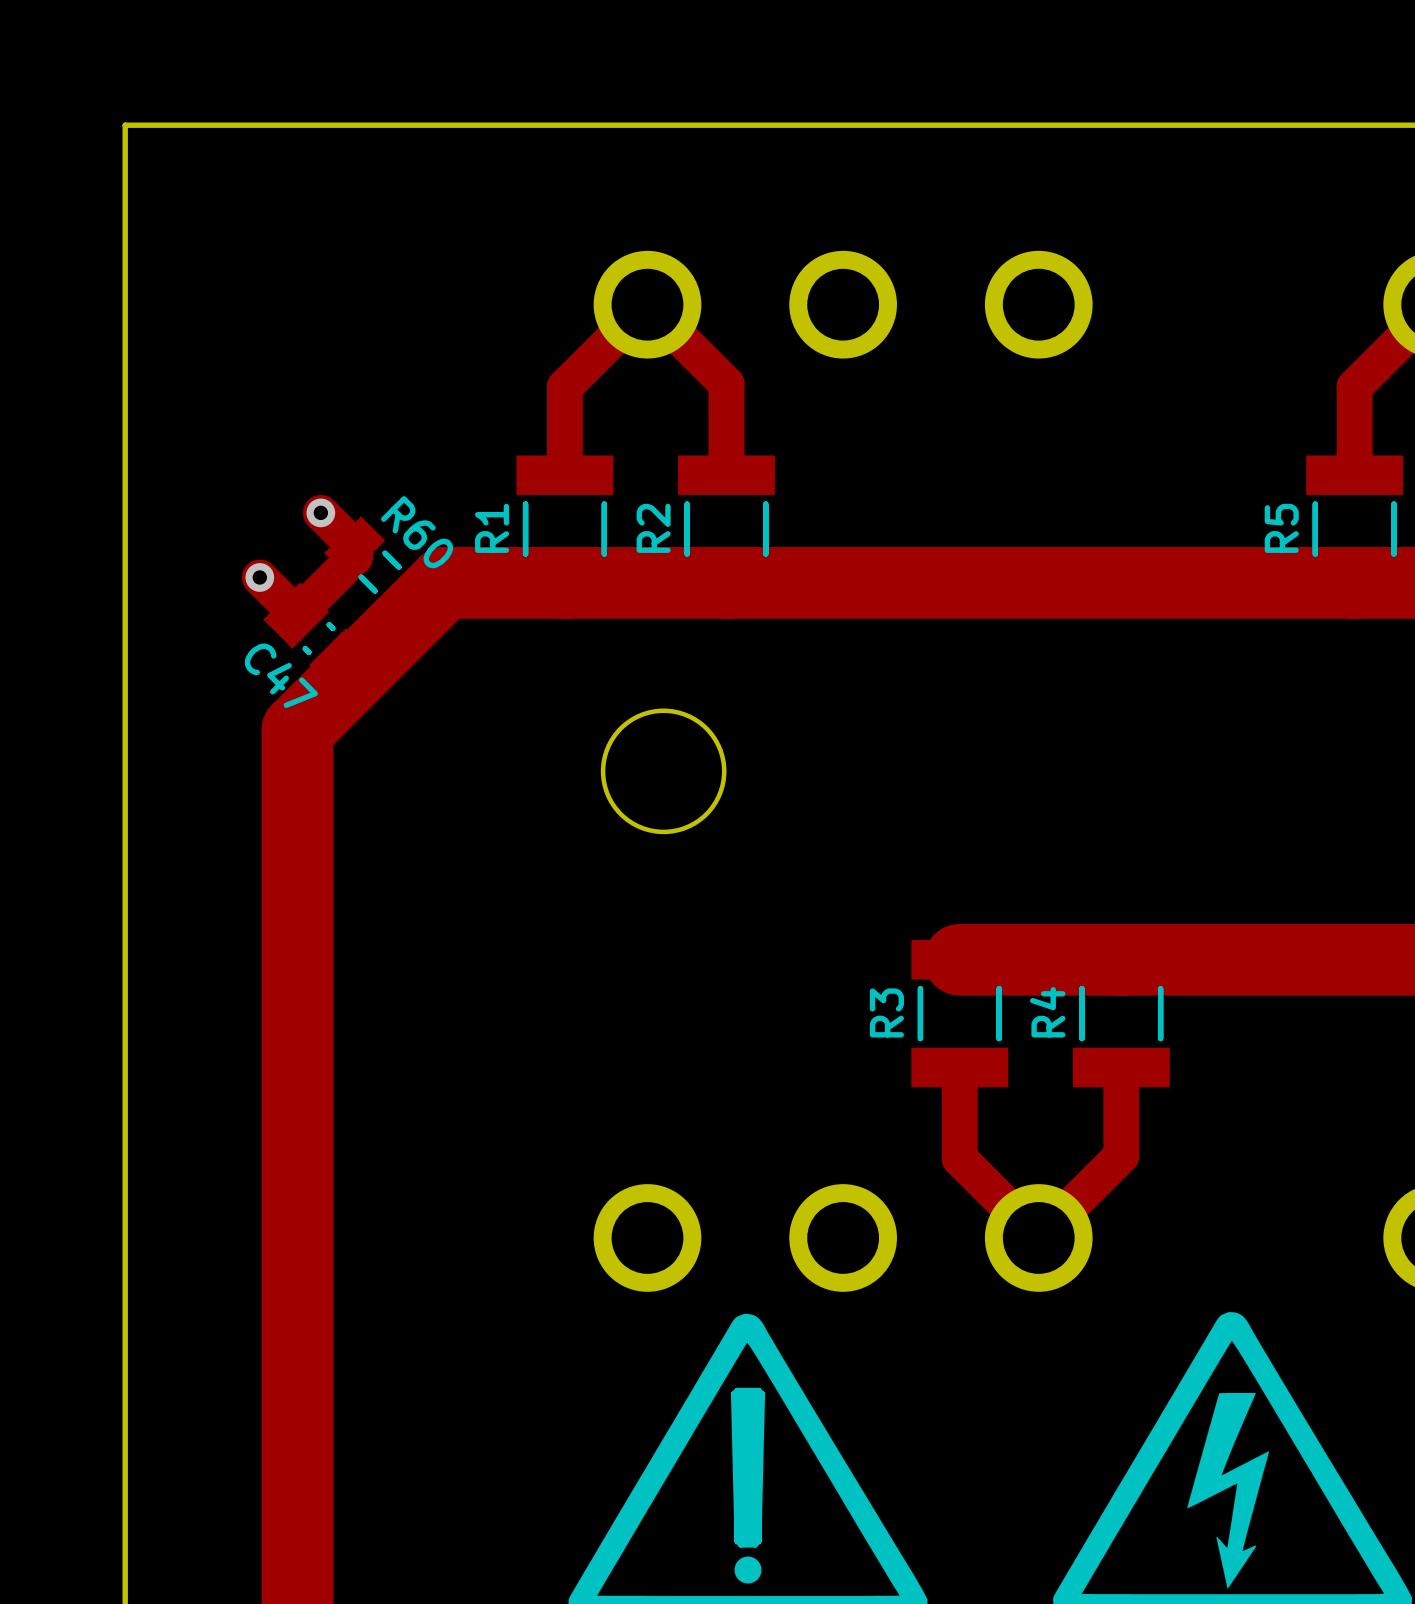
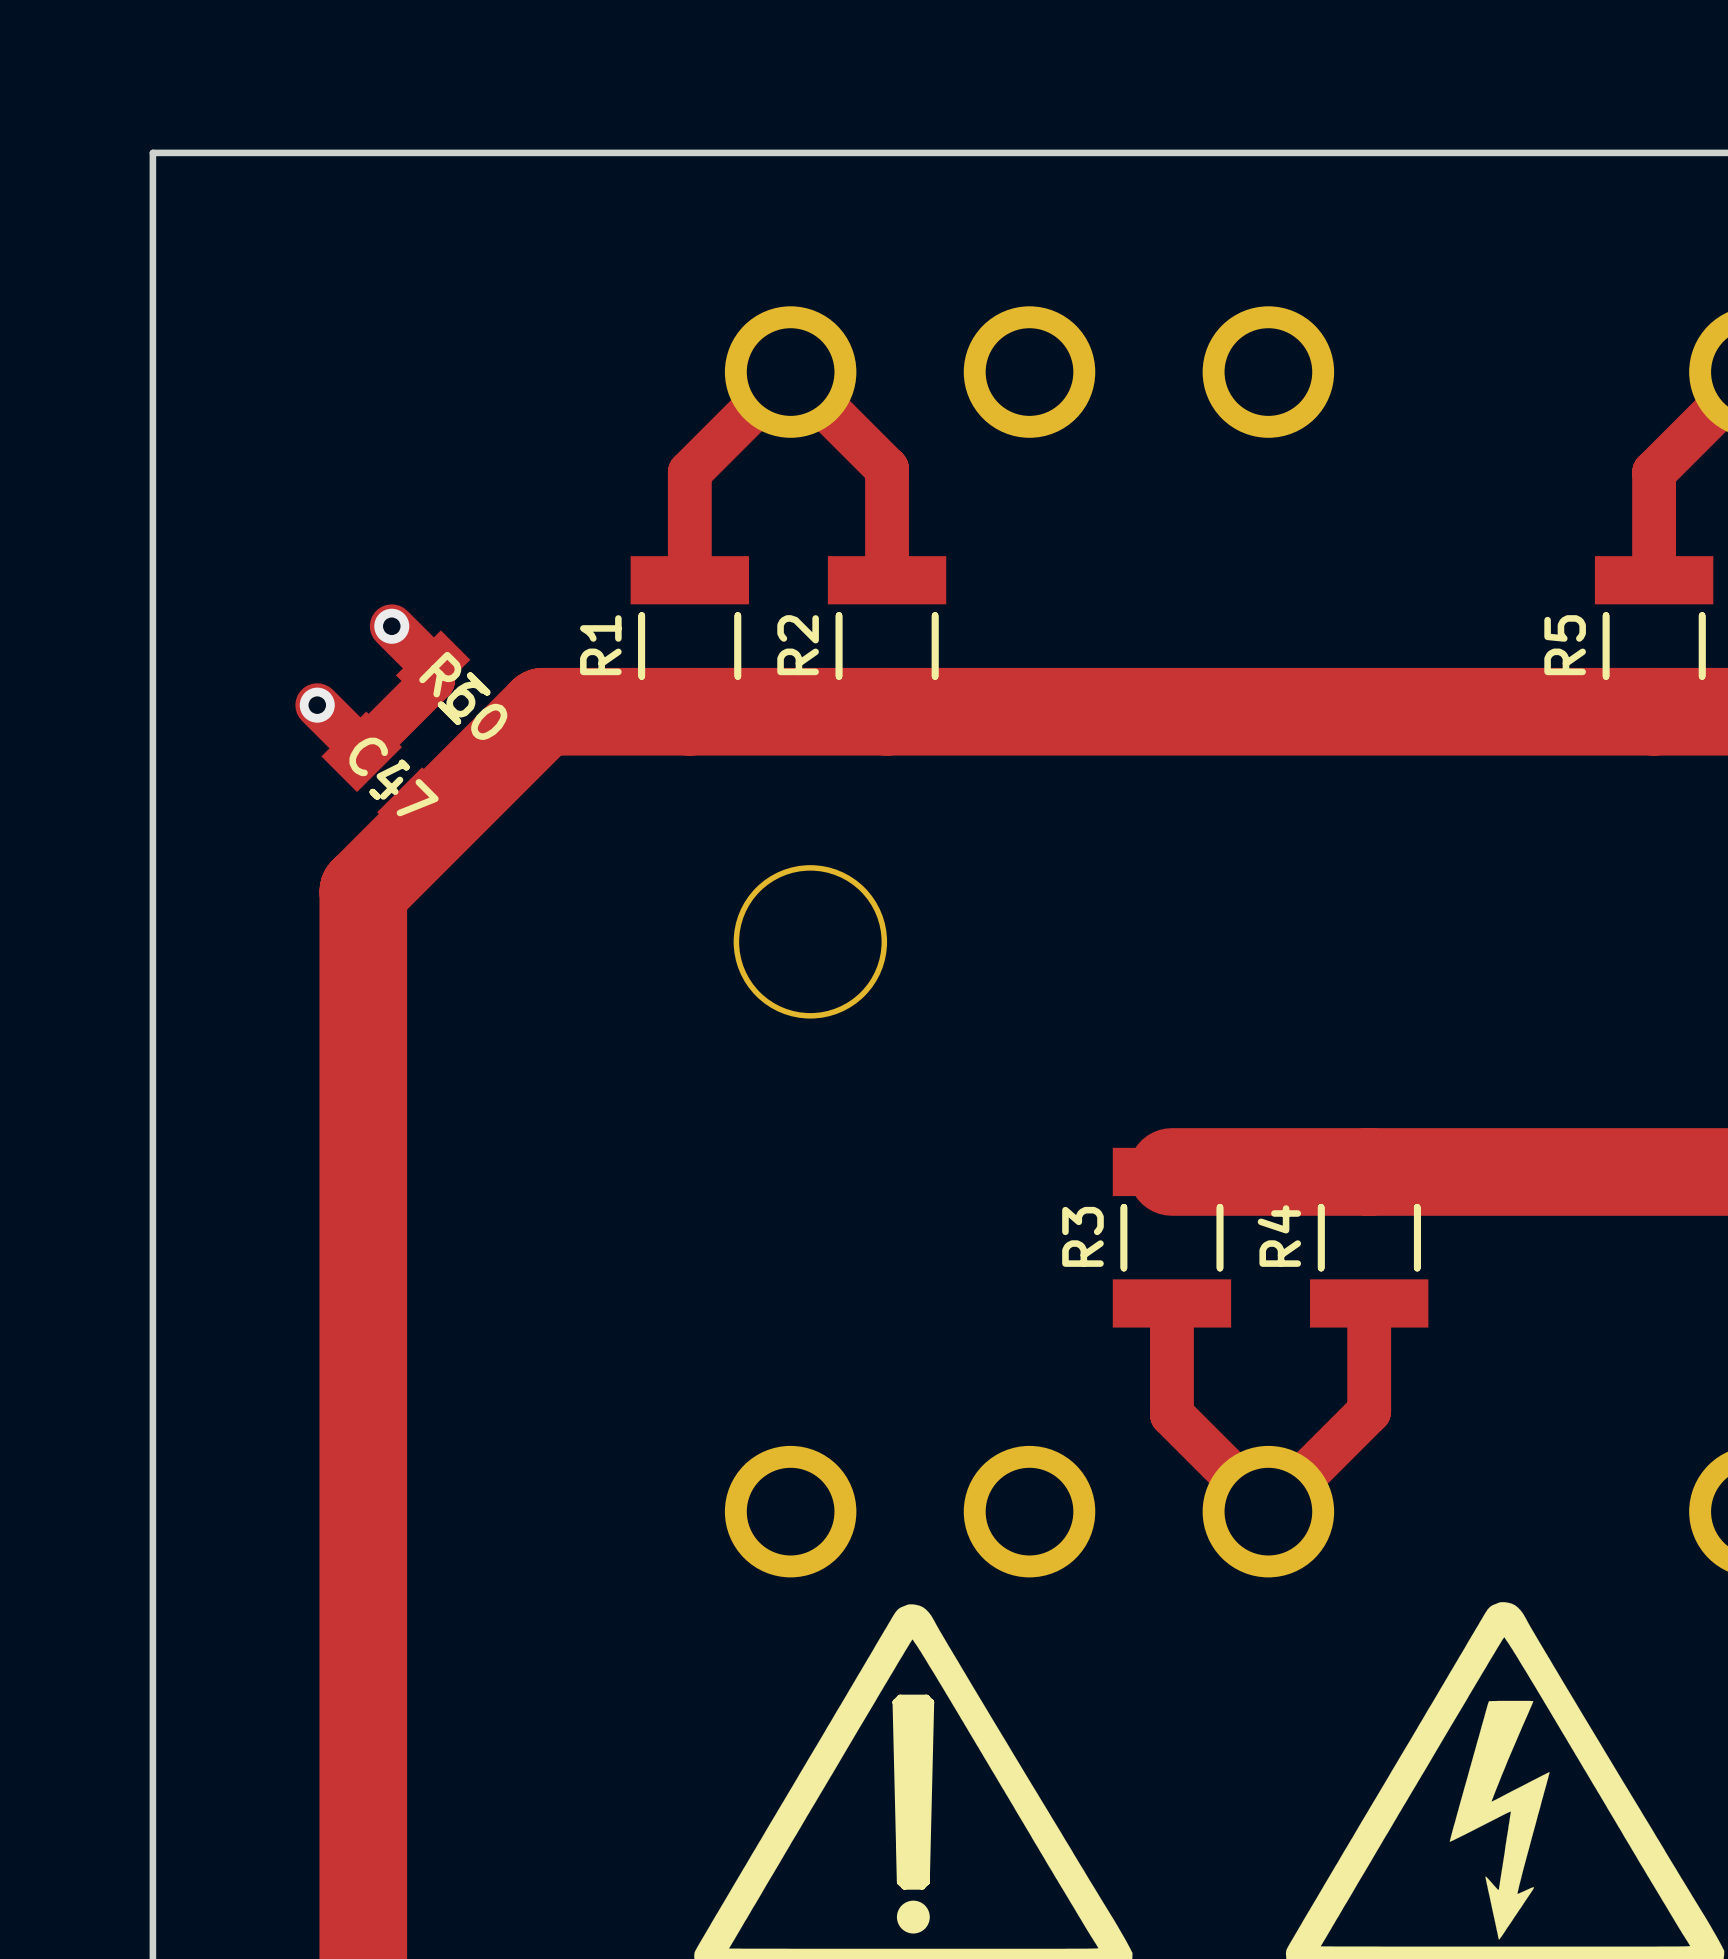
R60 name position: R60 (417, 532) -> R60 (463, 695)
C47 name position: C47 (281, 675) -> C47 (394, 776)

